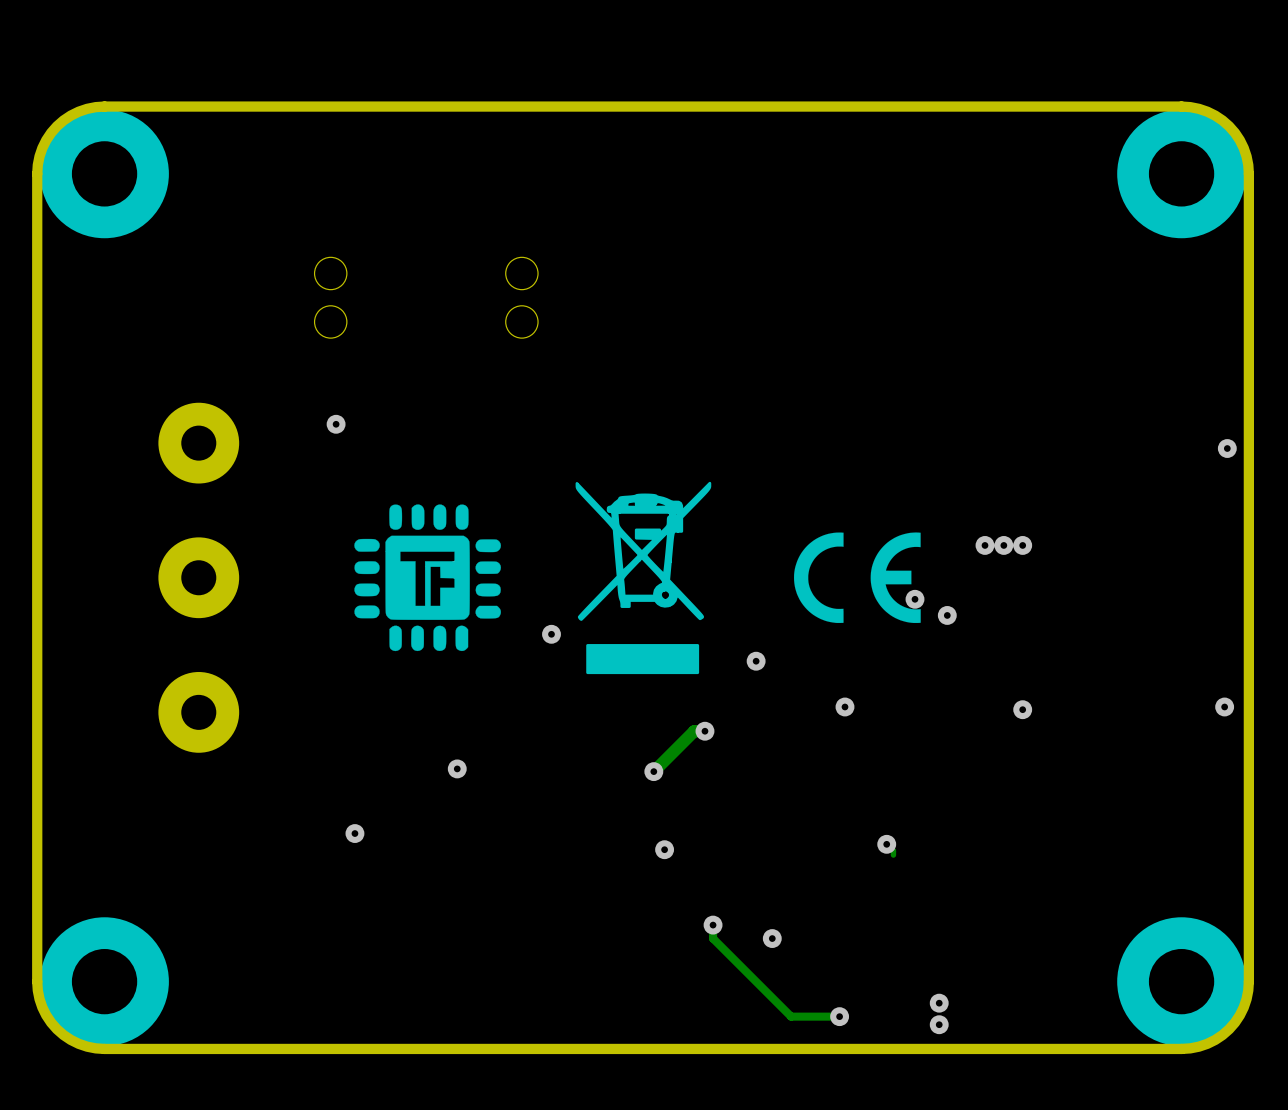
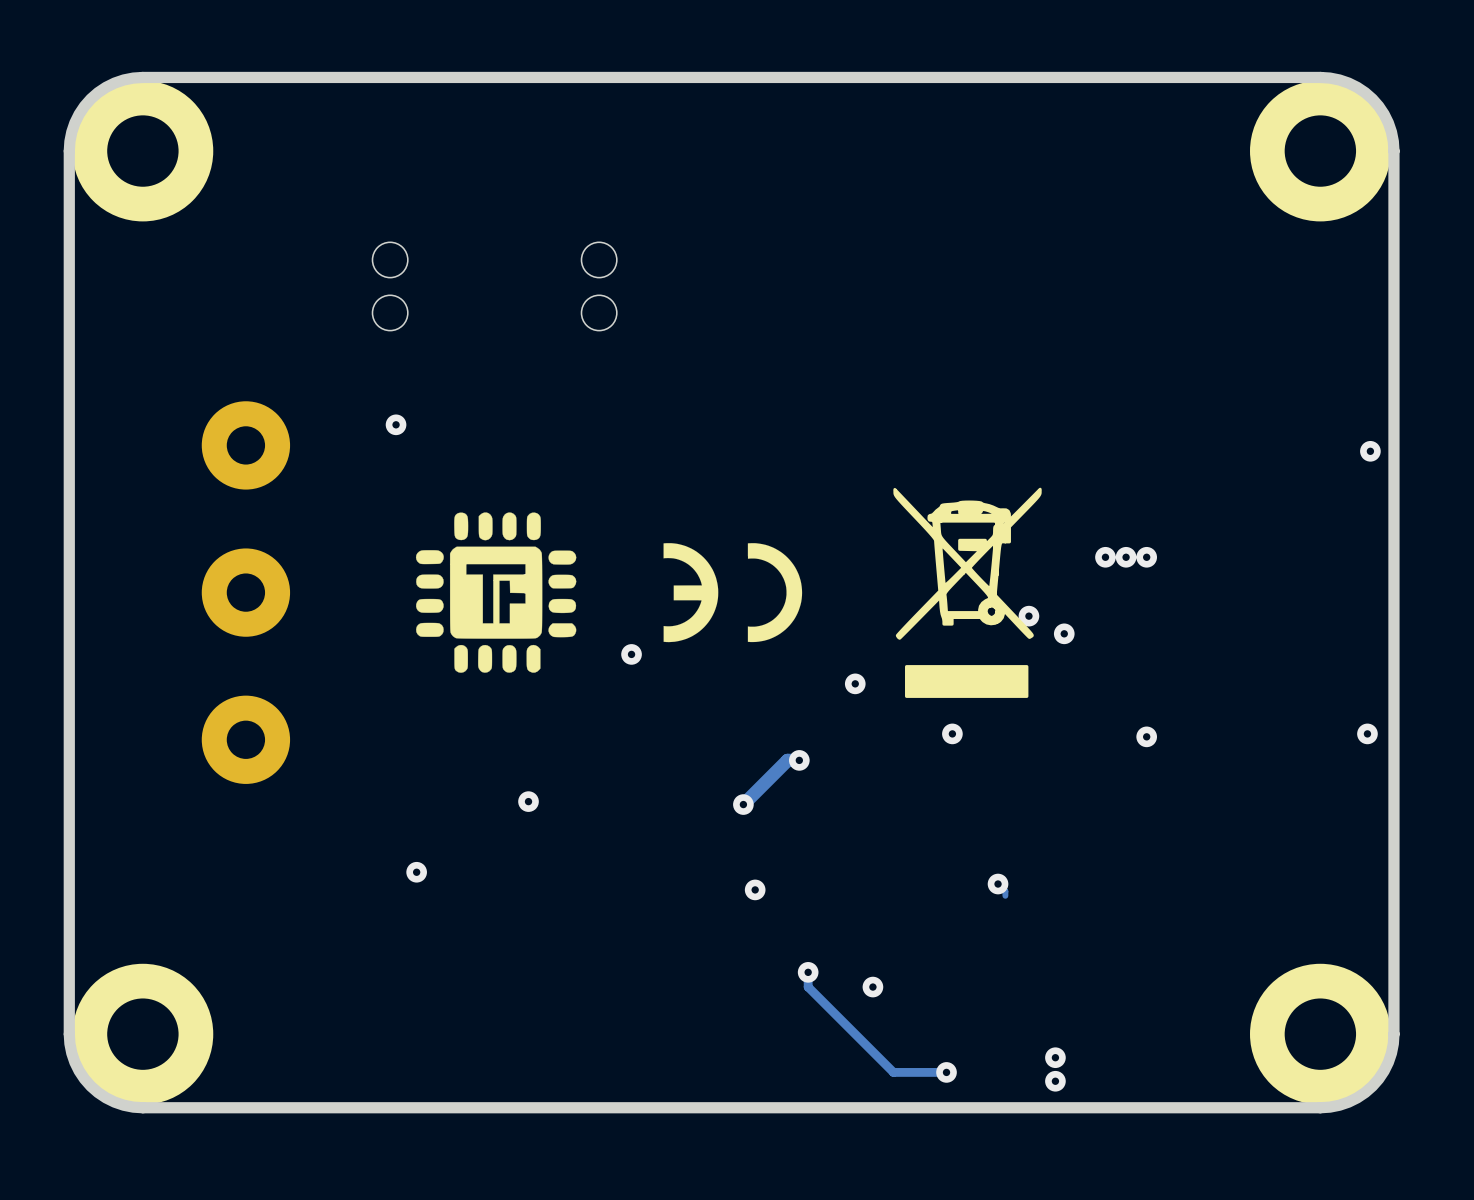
drawing: none -> [663, 543, 803, 643]
drawing: [793, 532, 921, 623] -> none
drawing position: (643, 577) -> (967, 592)

